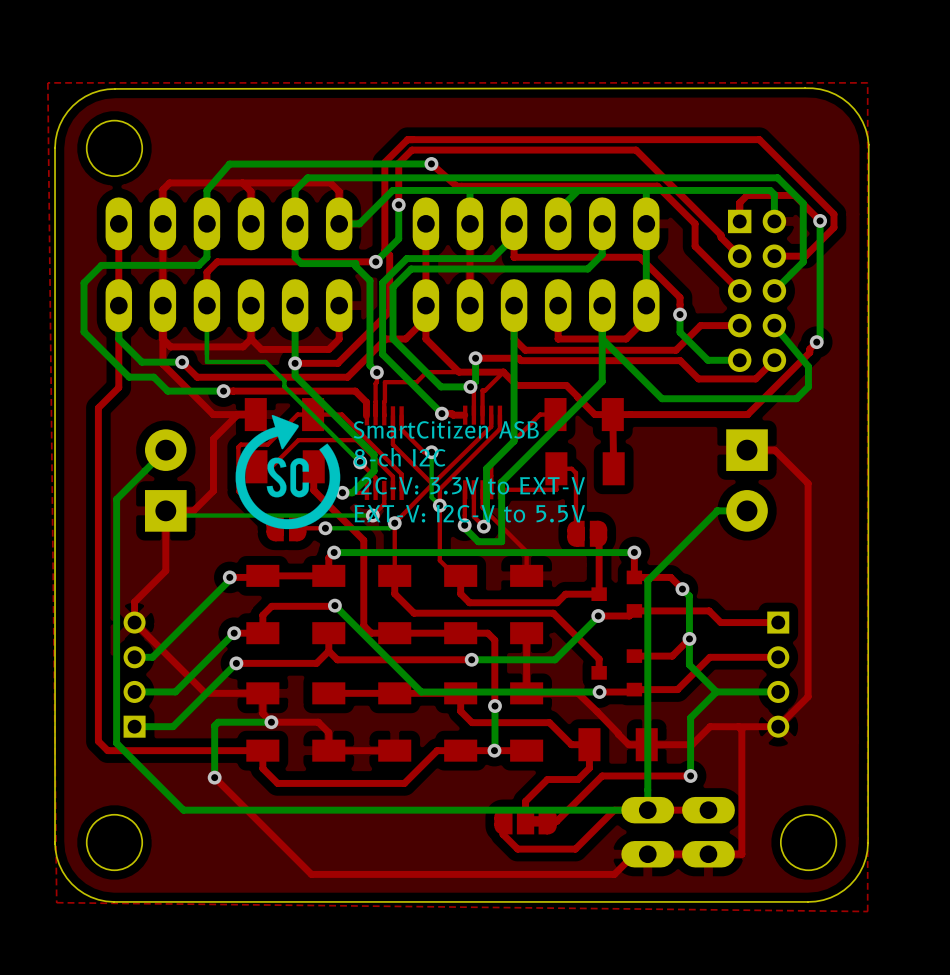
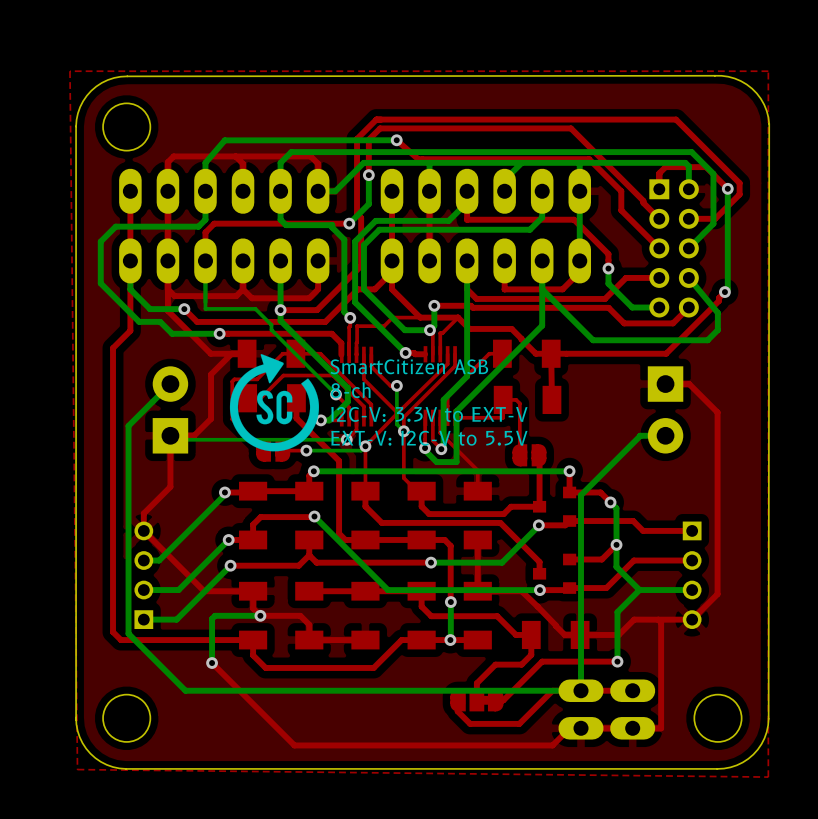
text: 8-ch I2C (399, 457) -> 8-ch (350, 390)

